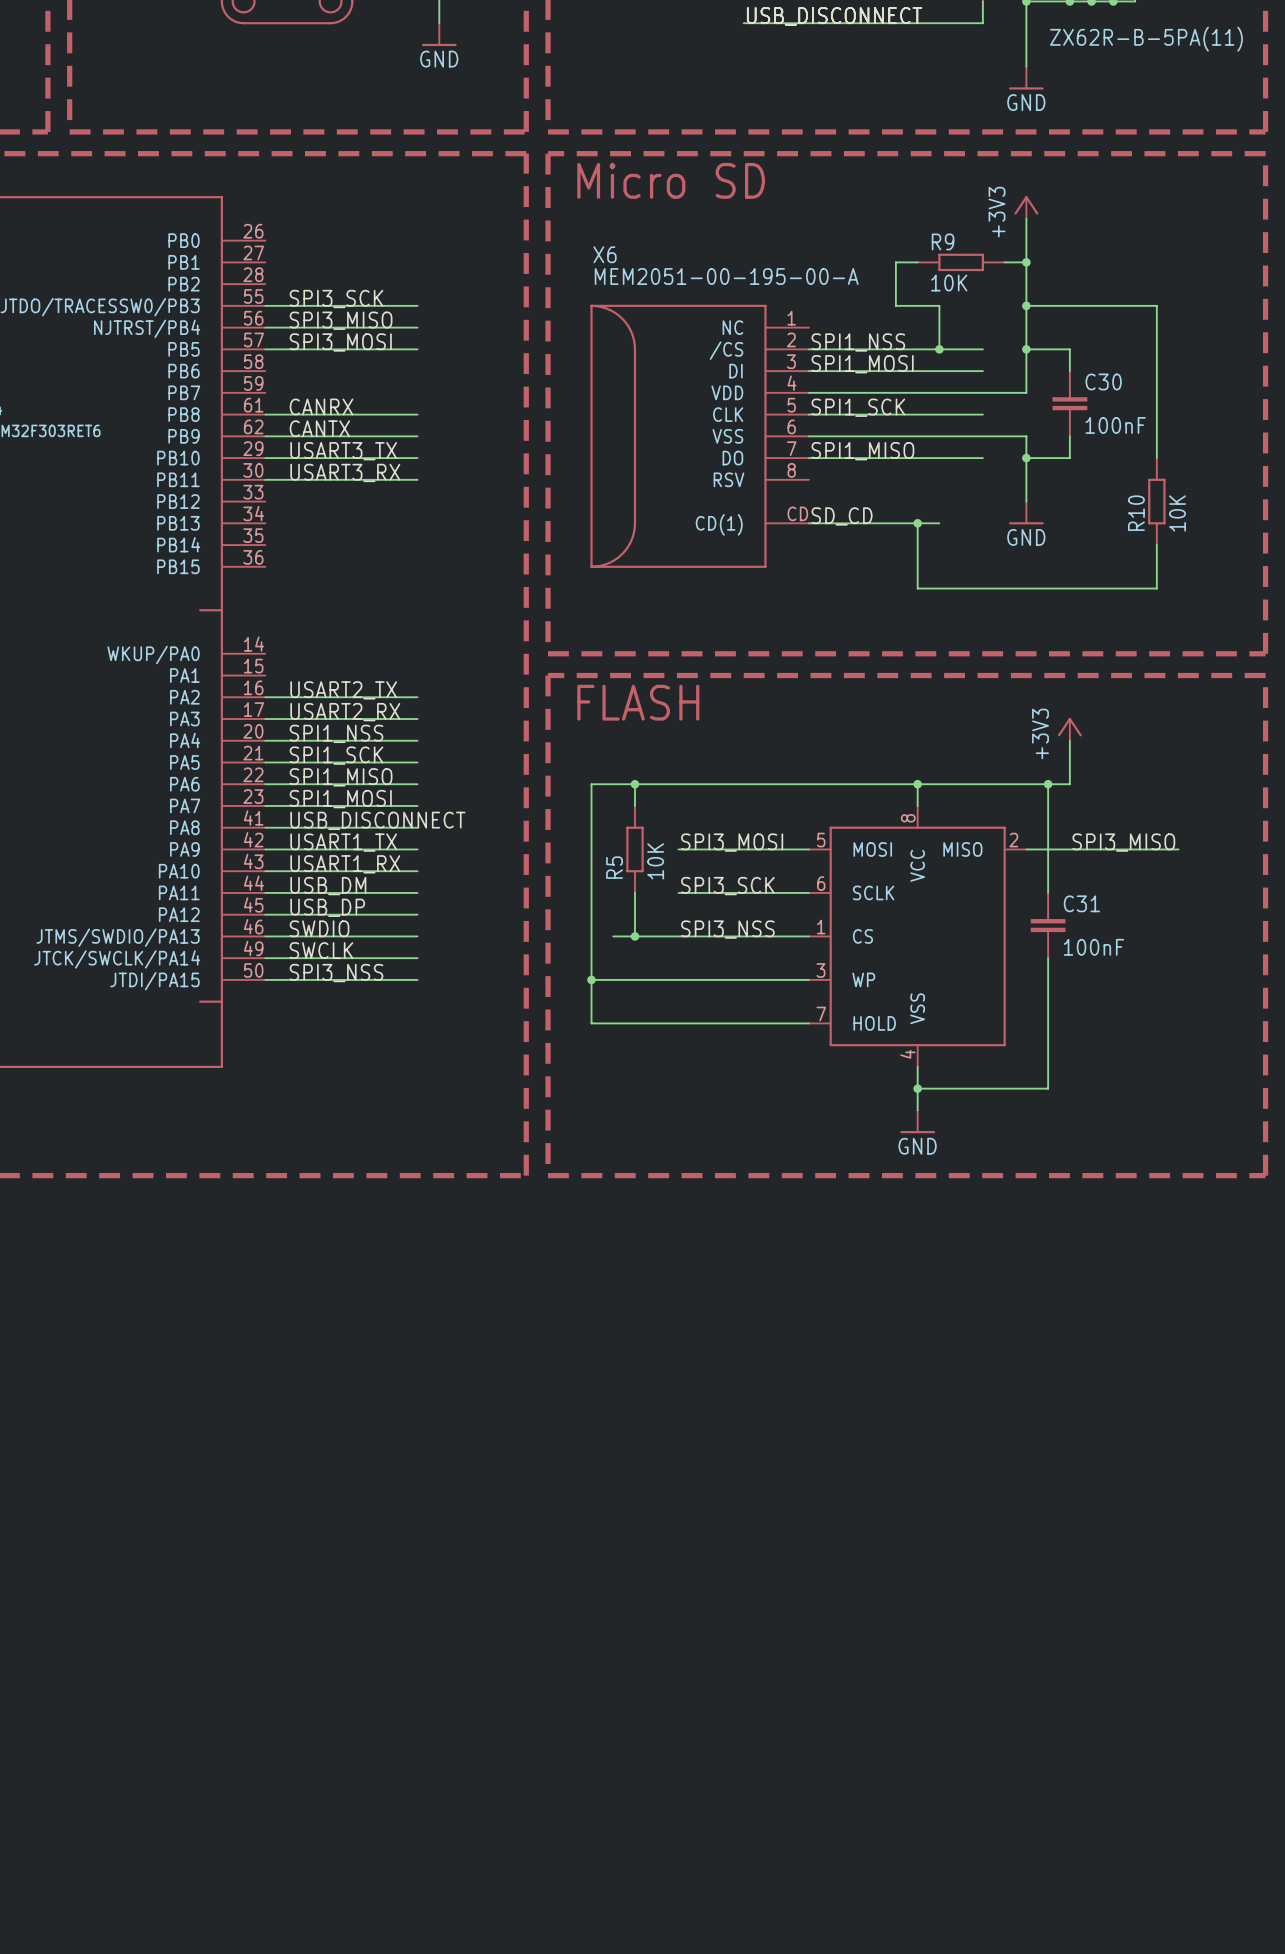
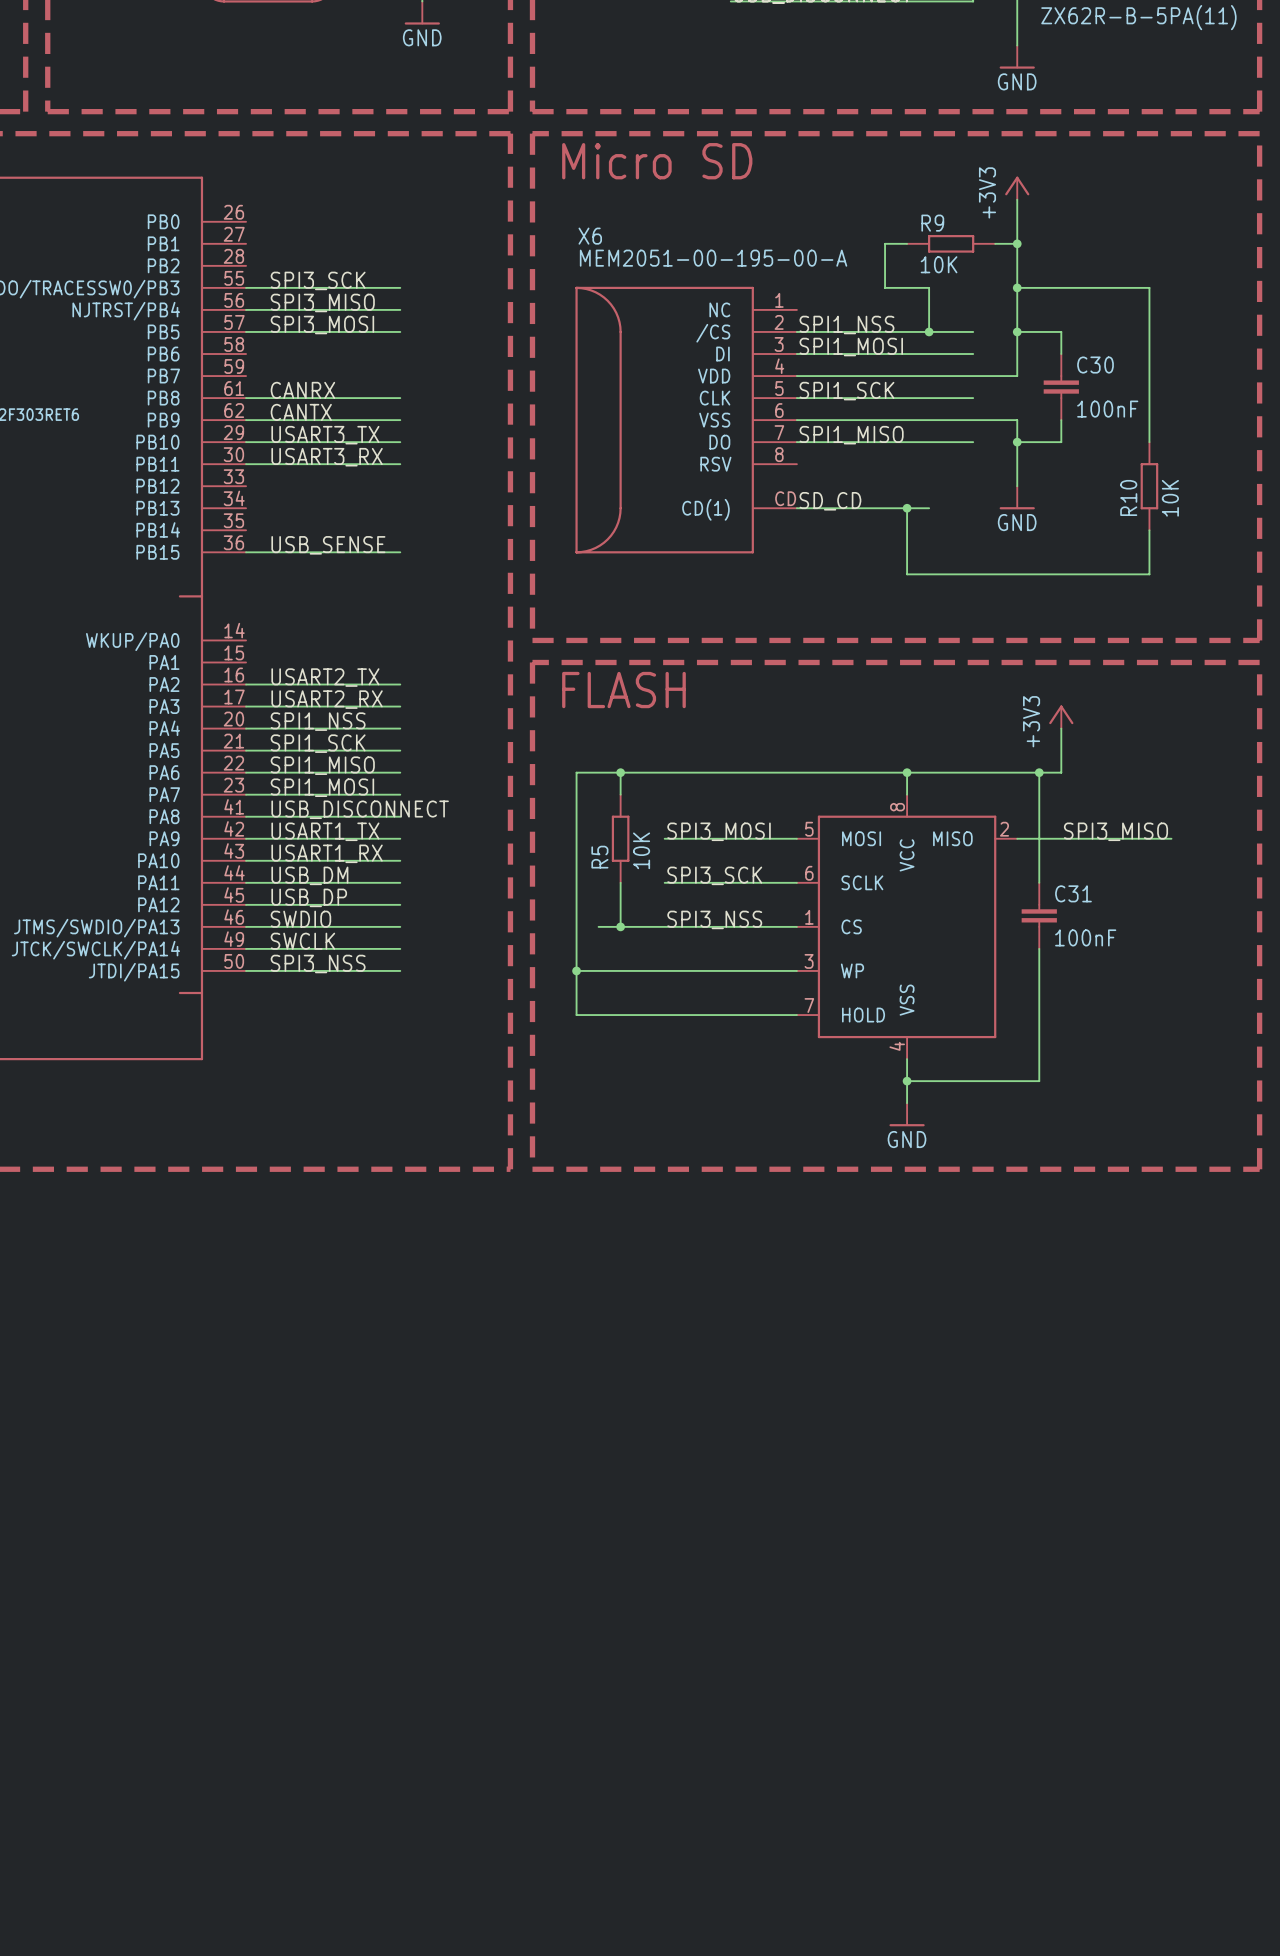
label: none -> USB_SENSE (328, 545)
wire: none -> (246, 552) (400, 552)

